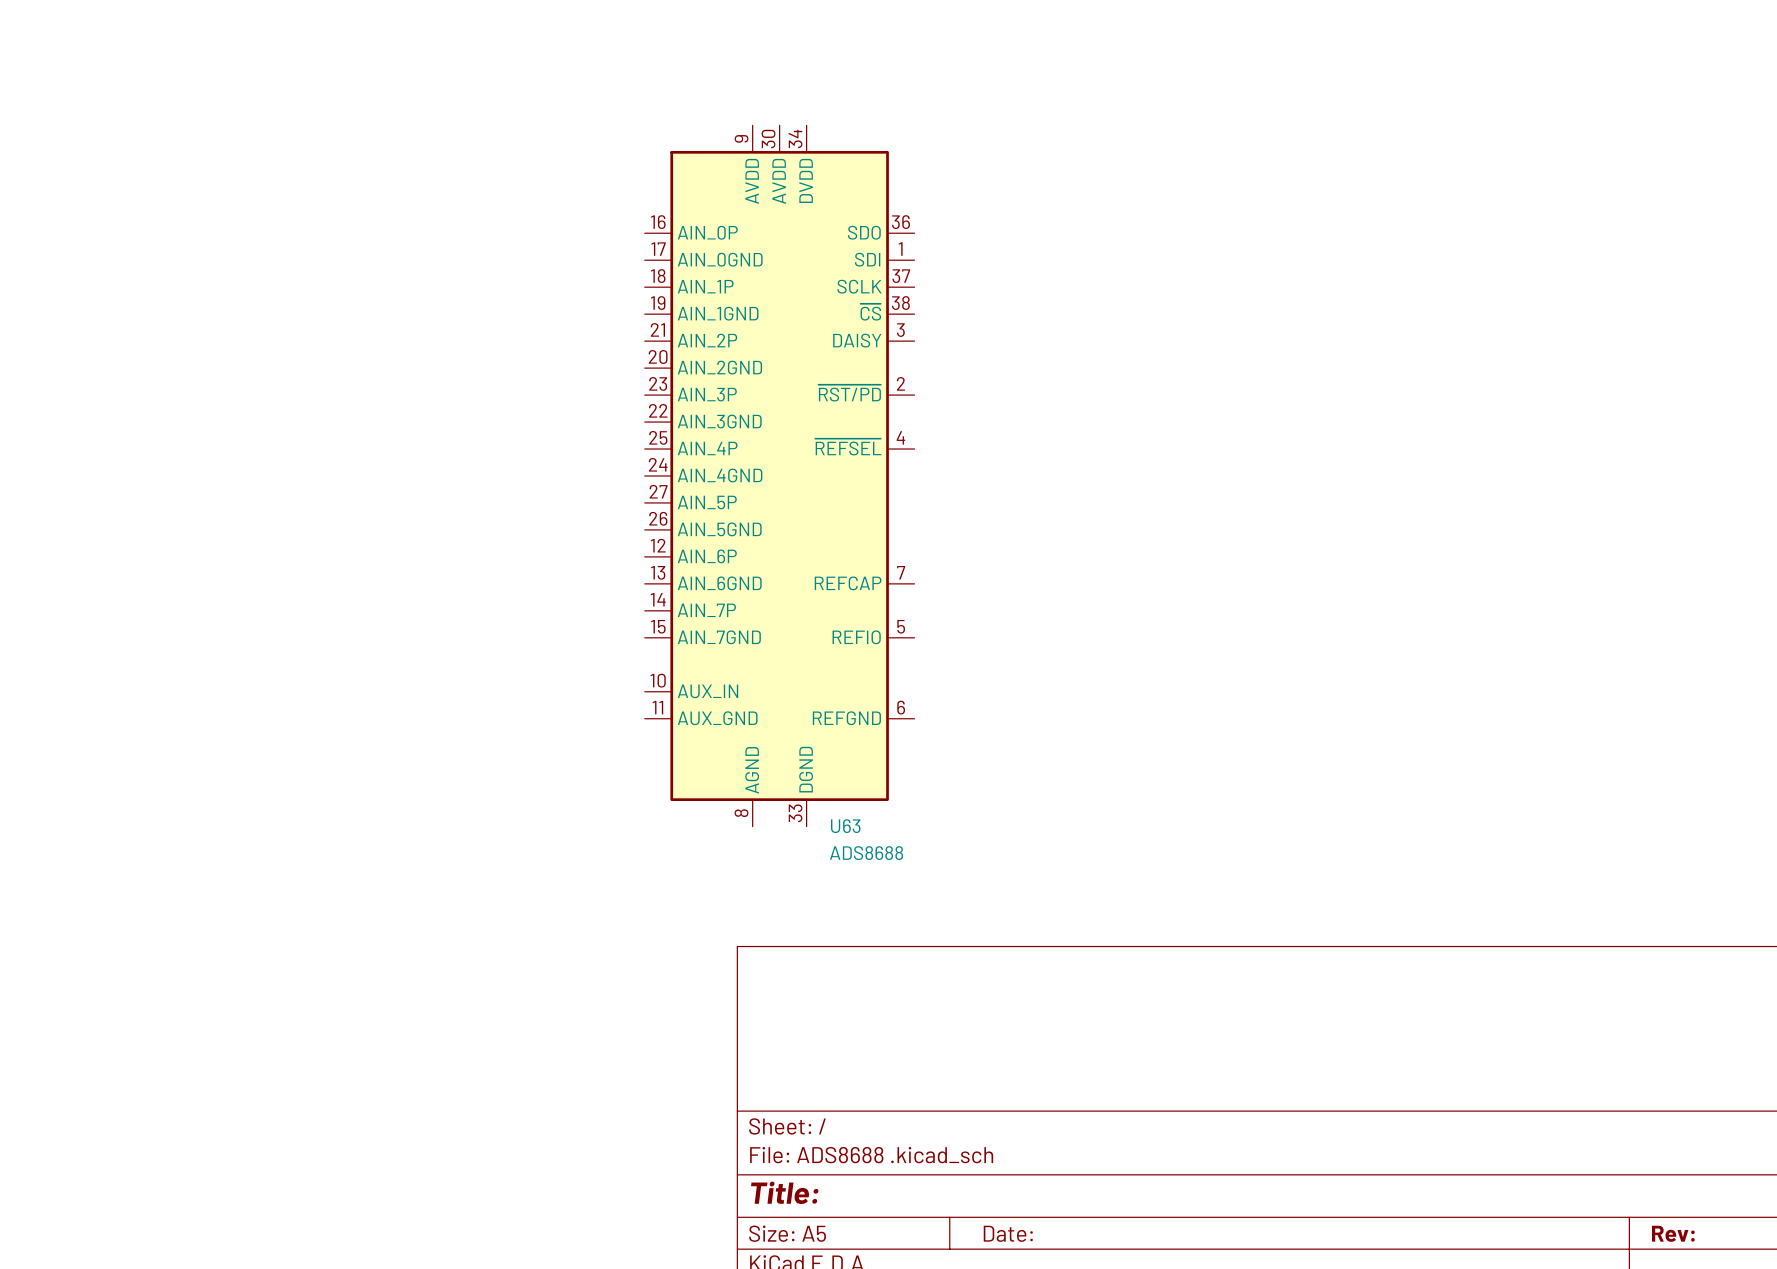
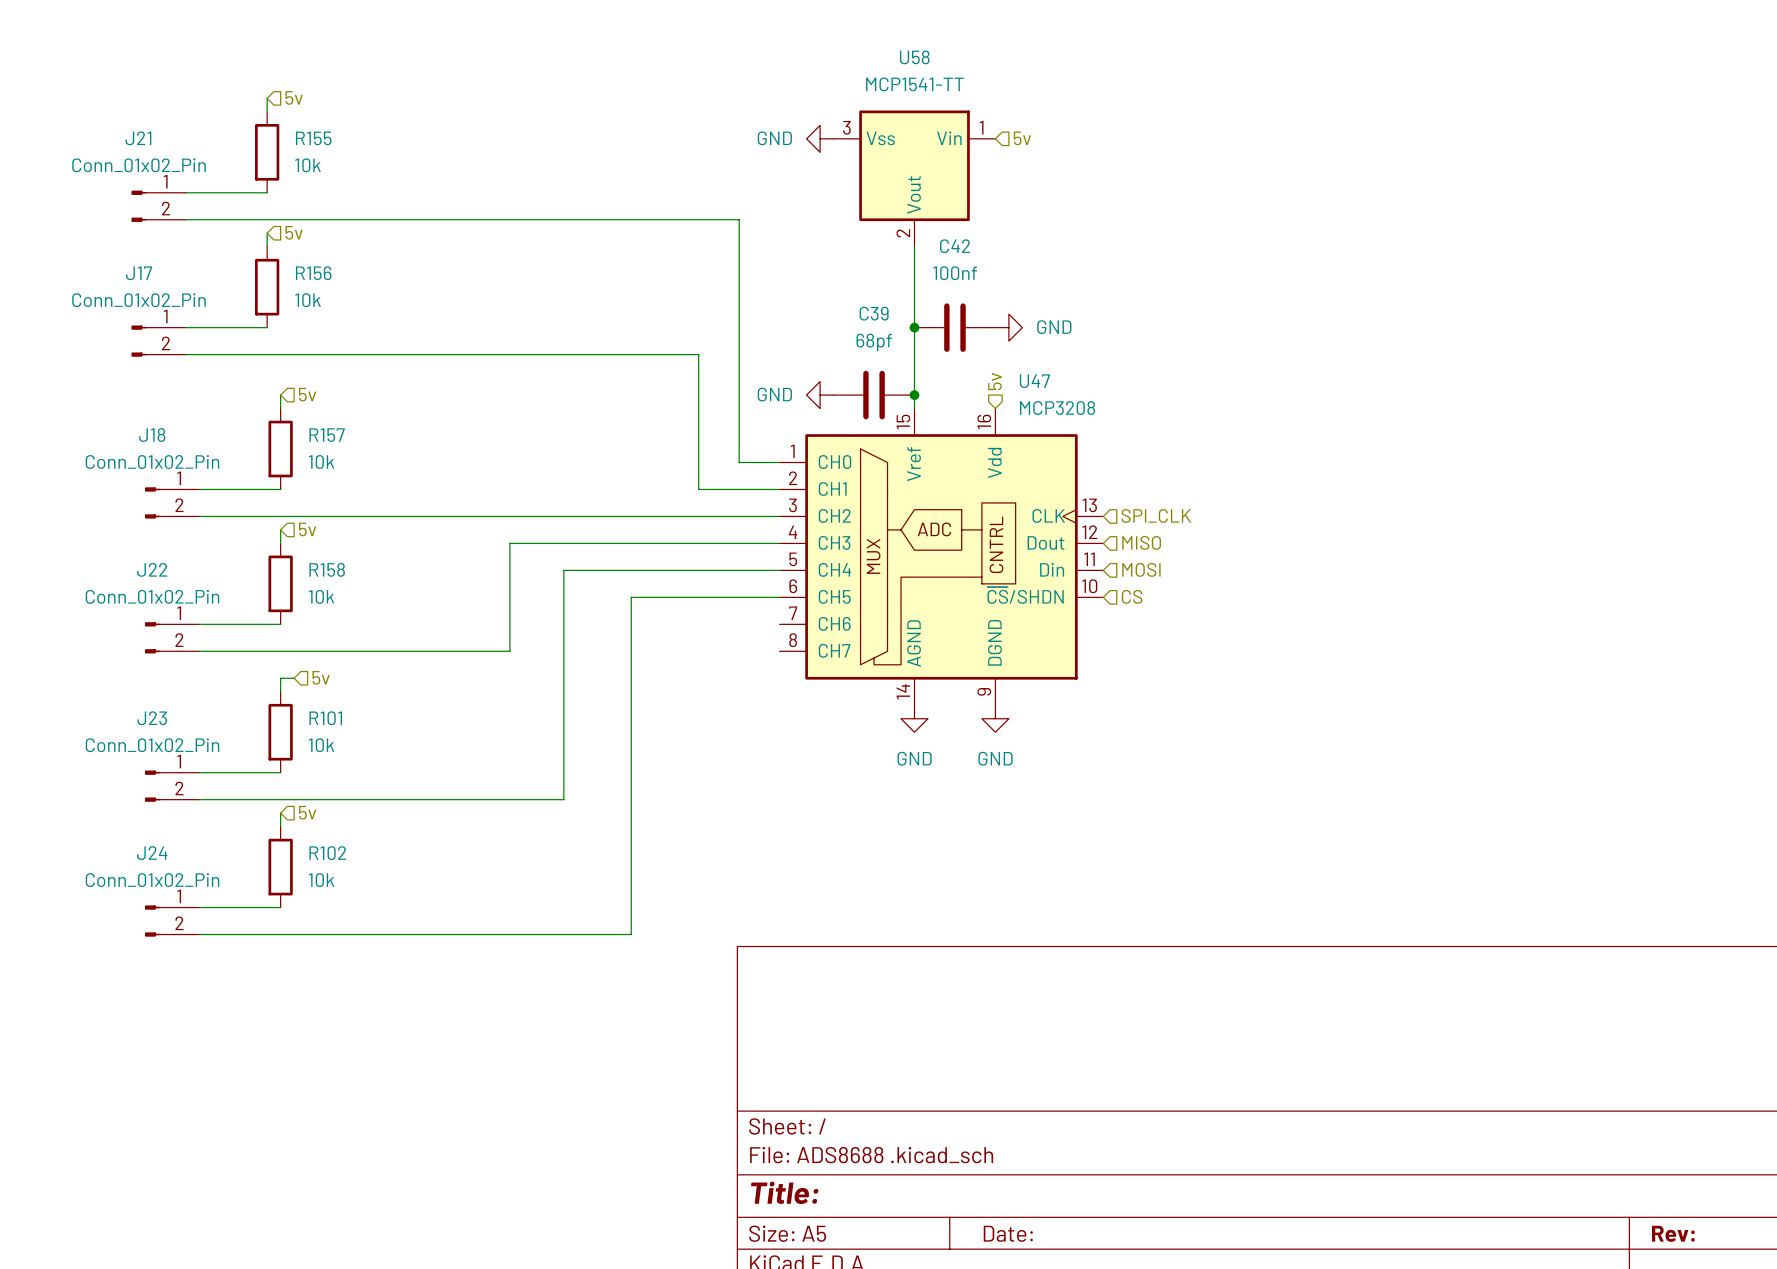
hierarchical label: none -> 5v (294, 97)
wire: none -> (267, 98) (267, 111)
power symbol: none -> GND (820, 138)
hierarchical label: none -> 5v (1022, 138)
R155: none -> 10k (267, 152)
U58: none -> MCP1541-TT (914, 178)
wire: none -> (186, 192) (267, 192)
J21: none -> Conn_01x02_Pin (158, 206)
wire: none -> (186, 219) (739, 219) (739, 462) (779, 462)
hierarchical label: none -> 5v (294, 232)
wire: none -> (267, 233) (267, 246)
wire: none -> (914, 246) (914, 408)
R156: none -> 10k (267, 287)
wire: none -> (186, 327) (267, 327)
junction: none -> (914, 327)
C42: none -> 100nf (954, 327)
power symbol: none -> GND (1008, 327)
J17: none -> Conn_01x02_Pin (158, 341)
wire: none -> (186, 354) (698, 354) (698, 489) (779, 489)
hierarchical label: none -> 5v (994, 381)
hierarchical label: none -> 5v (307, 394)
wire: none -> (280, 395) (280, 408)
power symbol: none -> GND (820, 395)
C39: none -> 68pf (874, 395)
junction: none -> (914, 395)
R157: none -> 10k (280, 449)
U63: ADS8688 (779, 475) -> none
wire: none -> (199, 489) (280, 489)
J18: none -> Conn_01x02_Pin (172, 502)
hierarchical label: none -> SPI_CLK (1156, 515)
wire: none -> (199, 516) (779, 516)
wire: none -> (280, 529) (280, 543)
hierarchical label: none -> 5v (307, 529)
hierarchical label: none -> MISO (1141, 542)
wire: none -> (779, 543) (509, 543) (509, 651) (199, 651)
U47: none -> MCP3208 (941, 556)
hierarchical label: none -> MOSI (1141, 569)
wire: none -> (779, 570) (563, 570) (563, 799) (199, 799)
R158: none -> 10k (280, 583)
hierarchical label: none -> CS (1132, 596)
wire: none -> (779, 597) (631, 597) (631, 934) (199, 934)
wire: none -> (199, 624) (280, 624)
J22: none -> Conn_01x02_Pin (172, 637)
hierarchical label: none -> 5v (321, 677)
wire: none -> (294, 678) (280, 678) (280, 691)
power symbol: none -> GND (914, 718)
power symbol: none -> GND (995, 718)
R101: none -> 10k (280, 732)
wire: none -> (199, 772) (280, 772)
J23: none -> Conn_01x02_Pin (172, 786)
hierarchical label: none -> 5v (307, 812)
wire: none -> (280, 813) (280, 826)
R102: none -> 10k (280, 867)
wire: none -> (199, 907) (280, 907)
J24: none -> Conn_01x02_Pin (172, 921)

